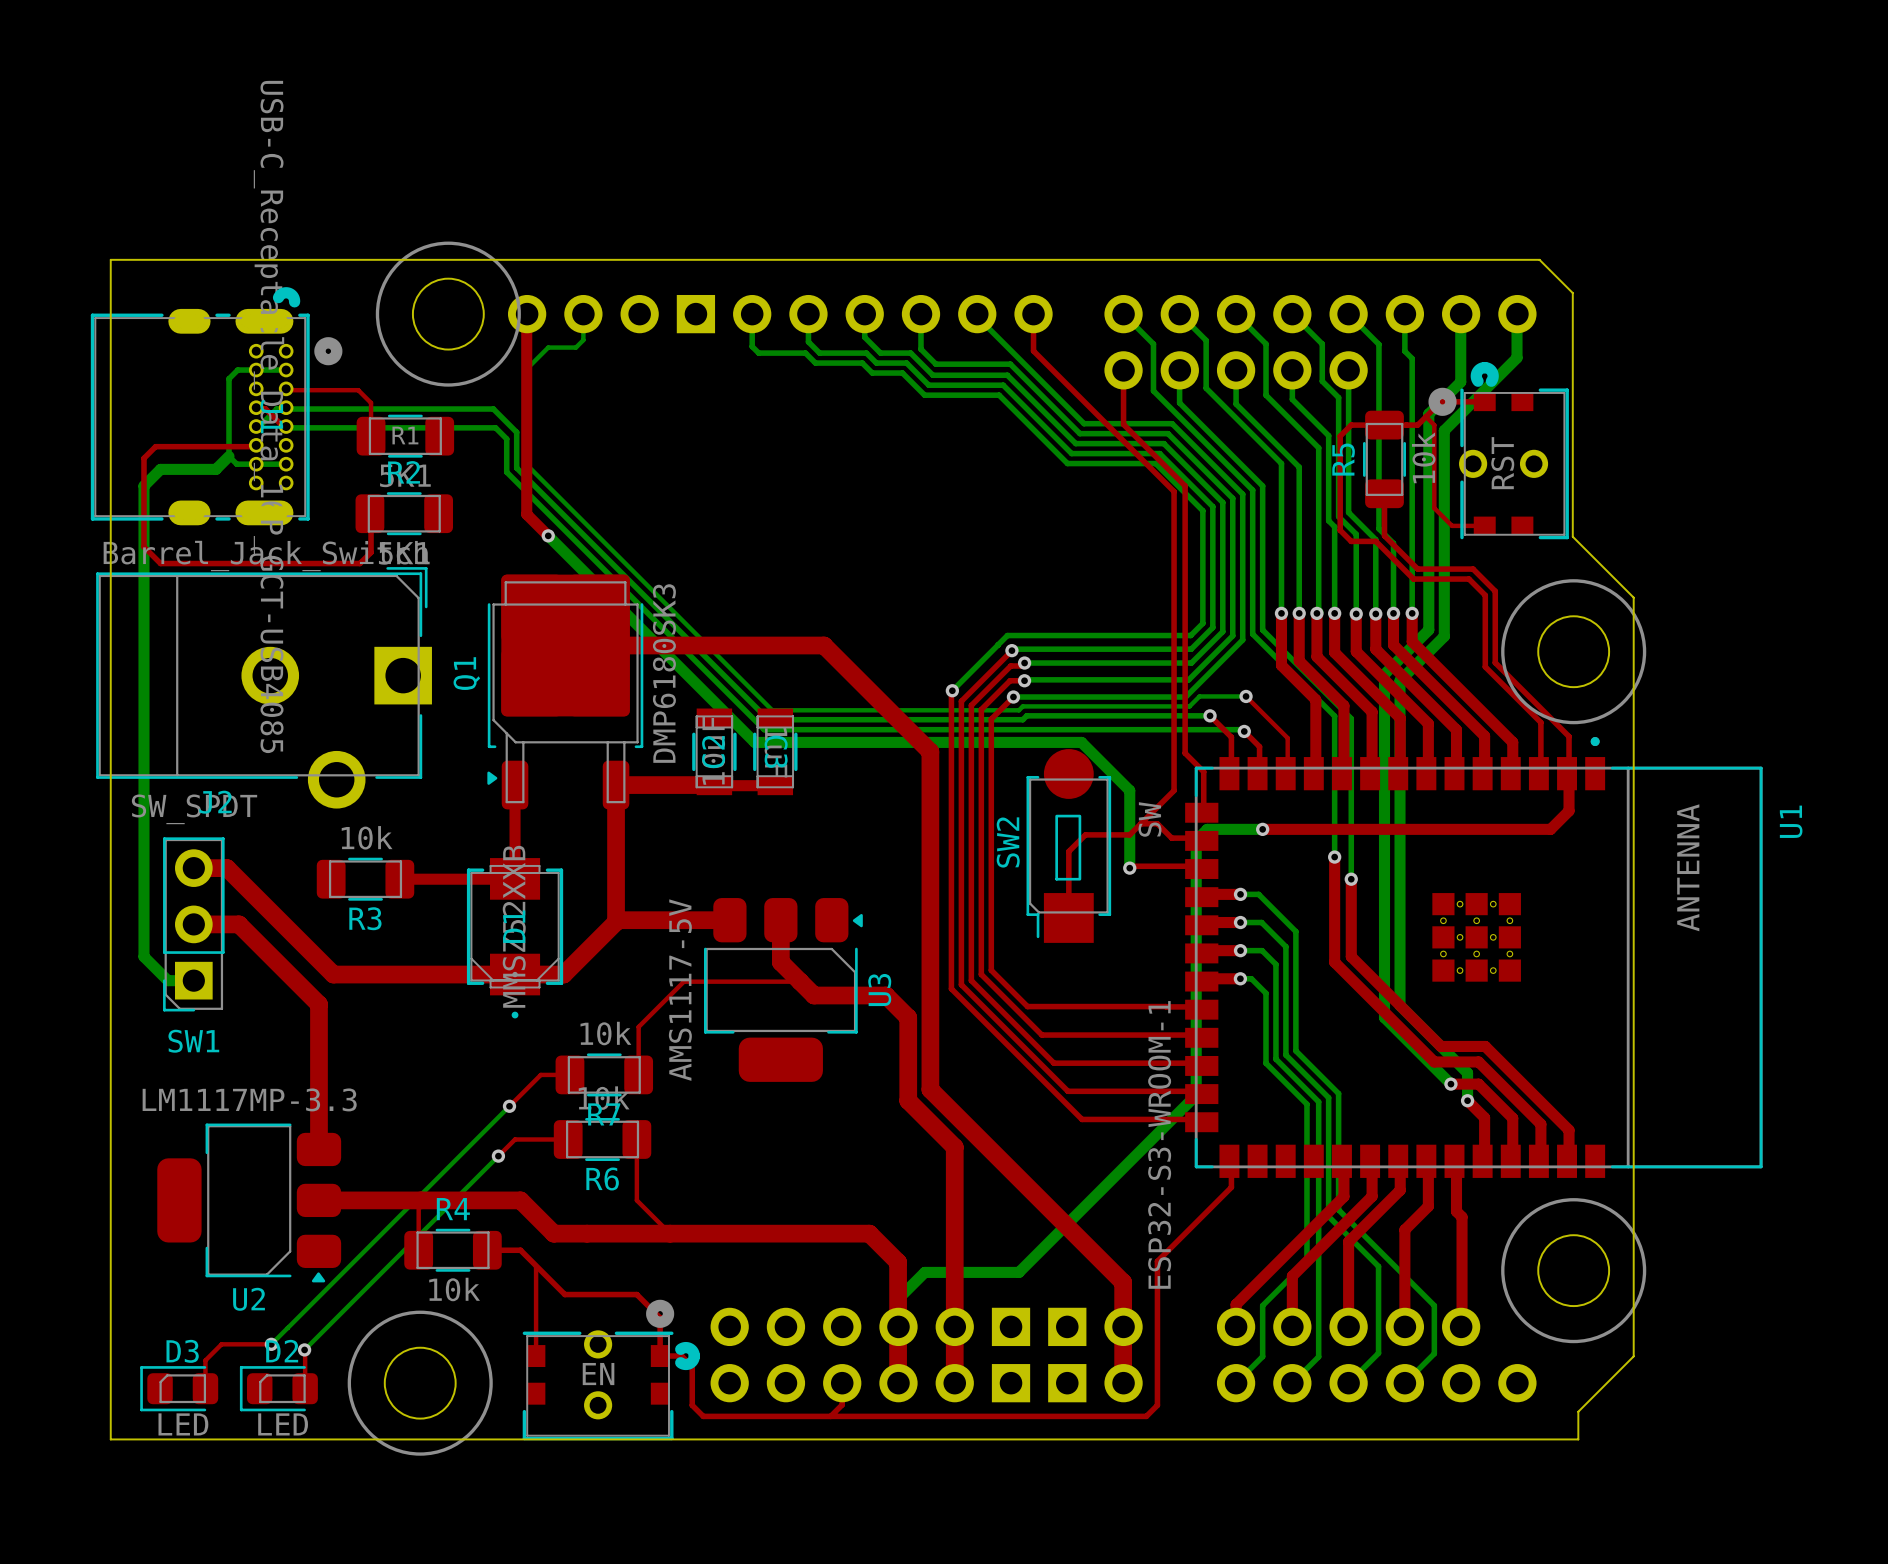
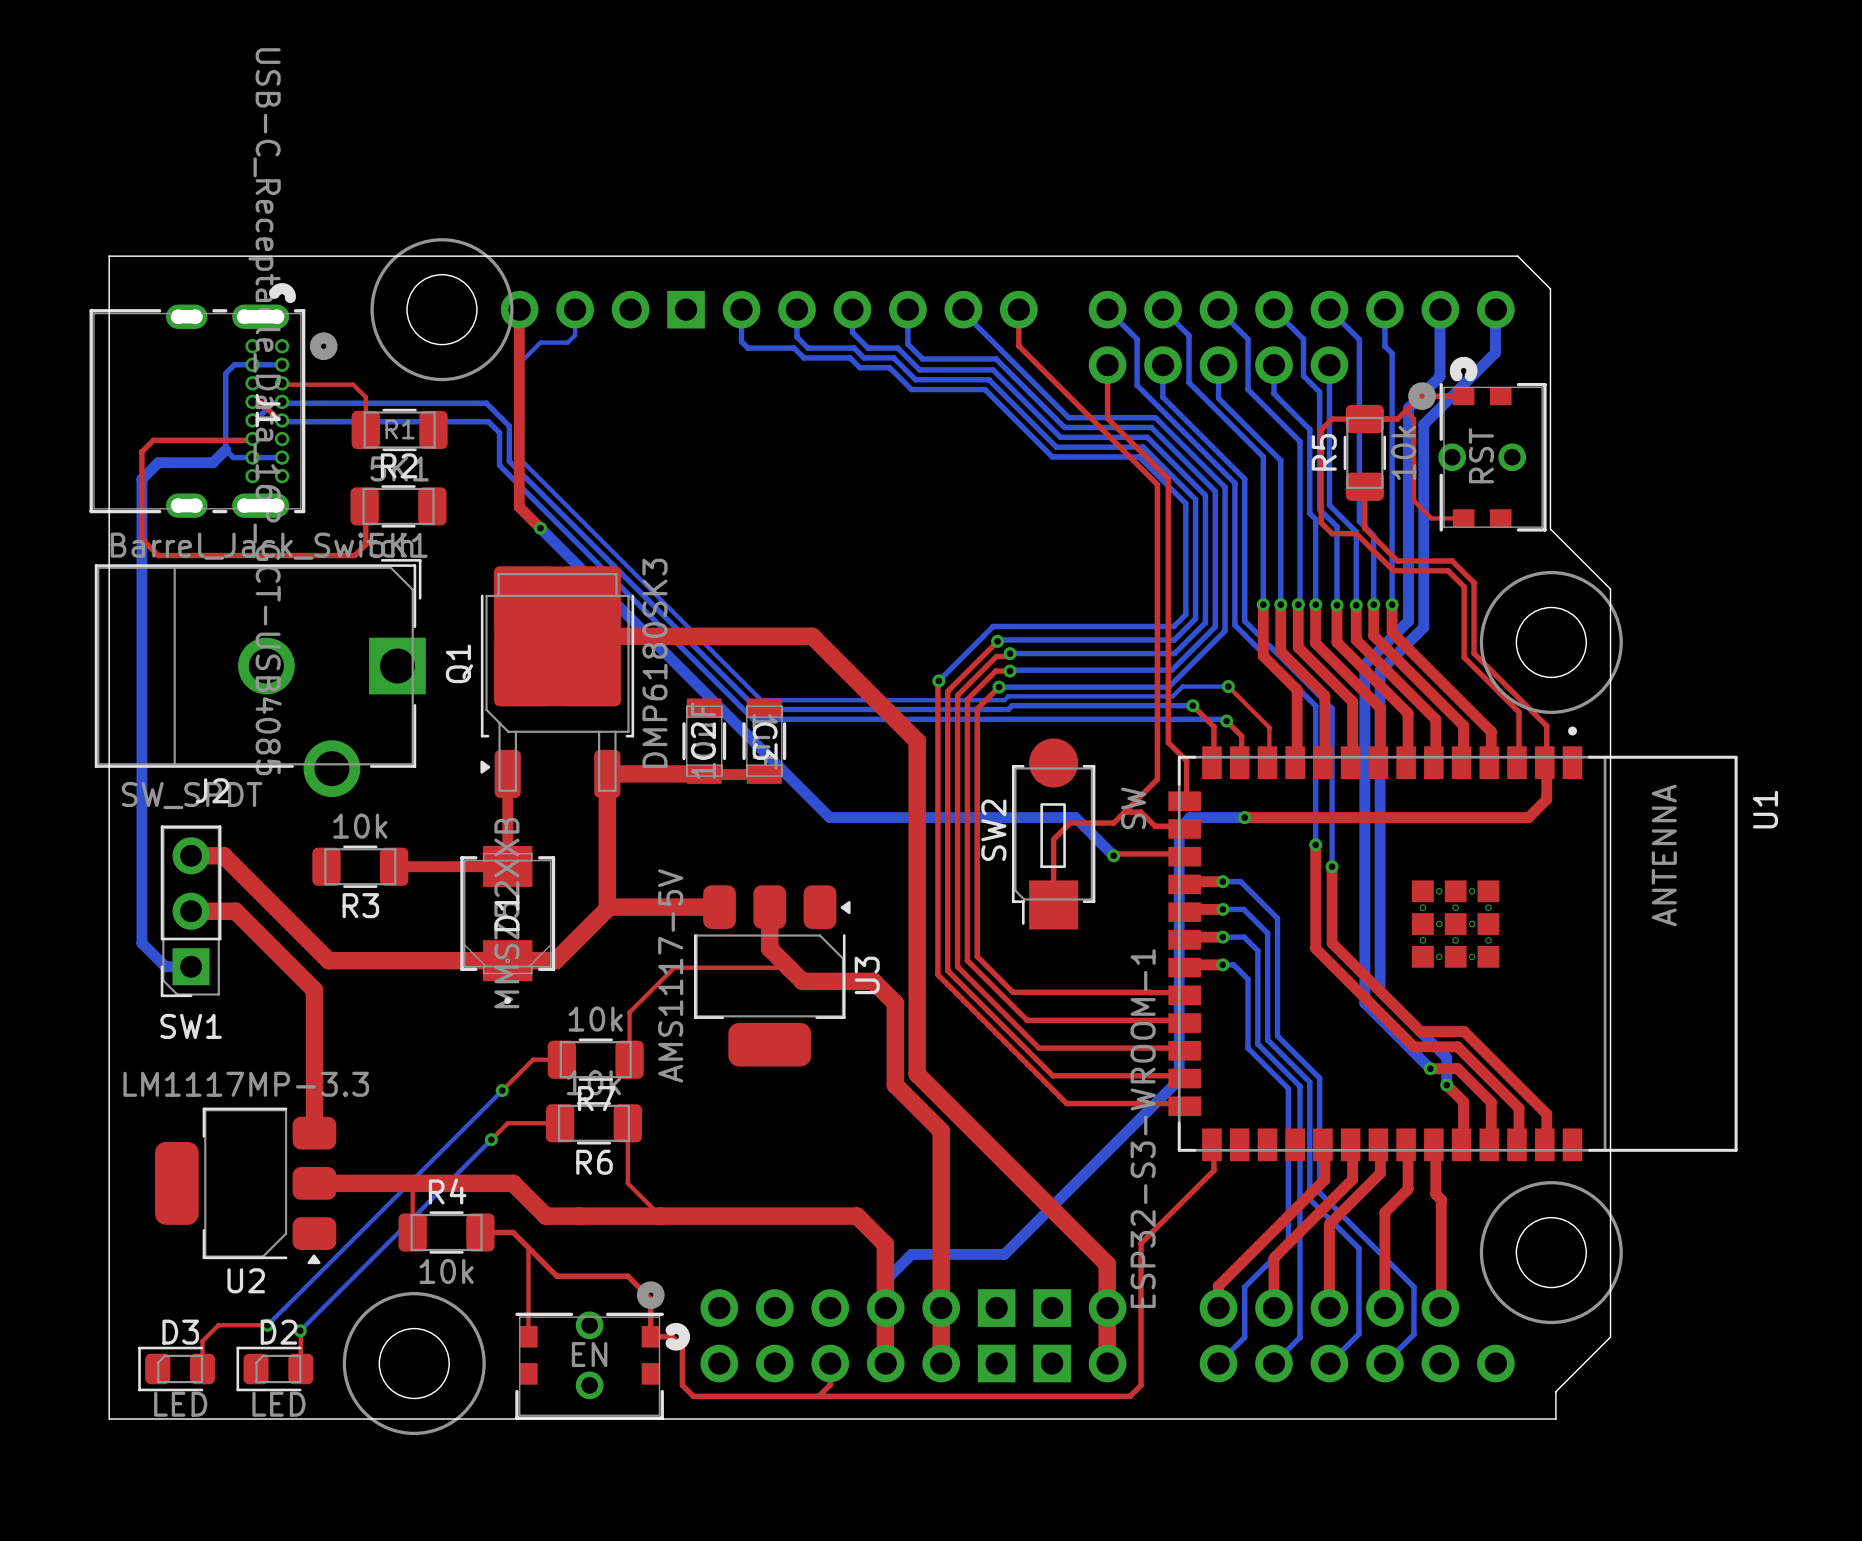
bottom track: (754, 742) (1081, 742) (1129, 790) (1129, 868) -> (744, 731) (829, 817) (1075, 817) (1113, 855)

